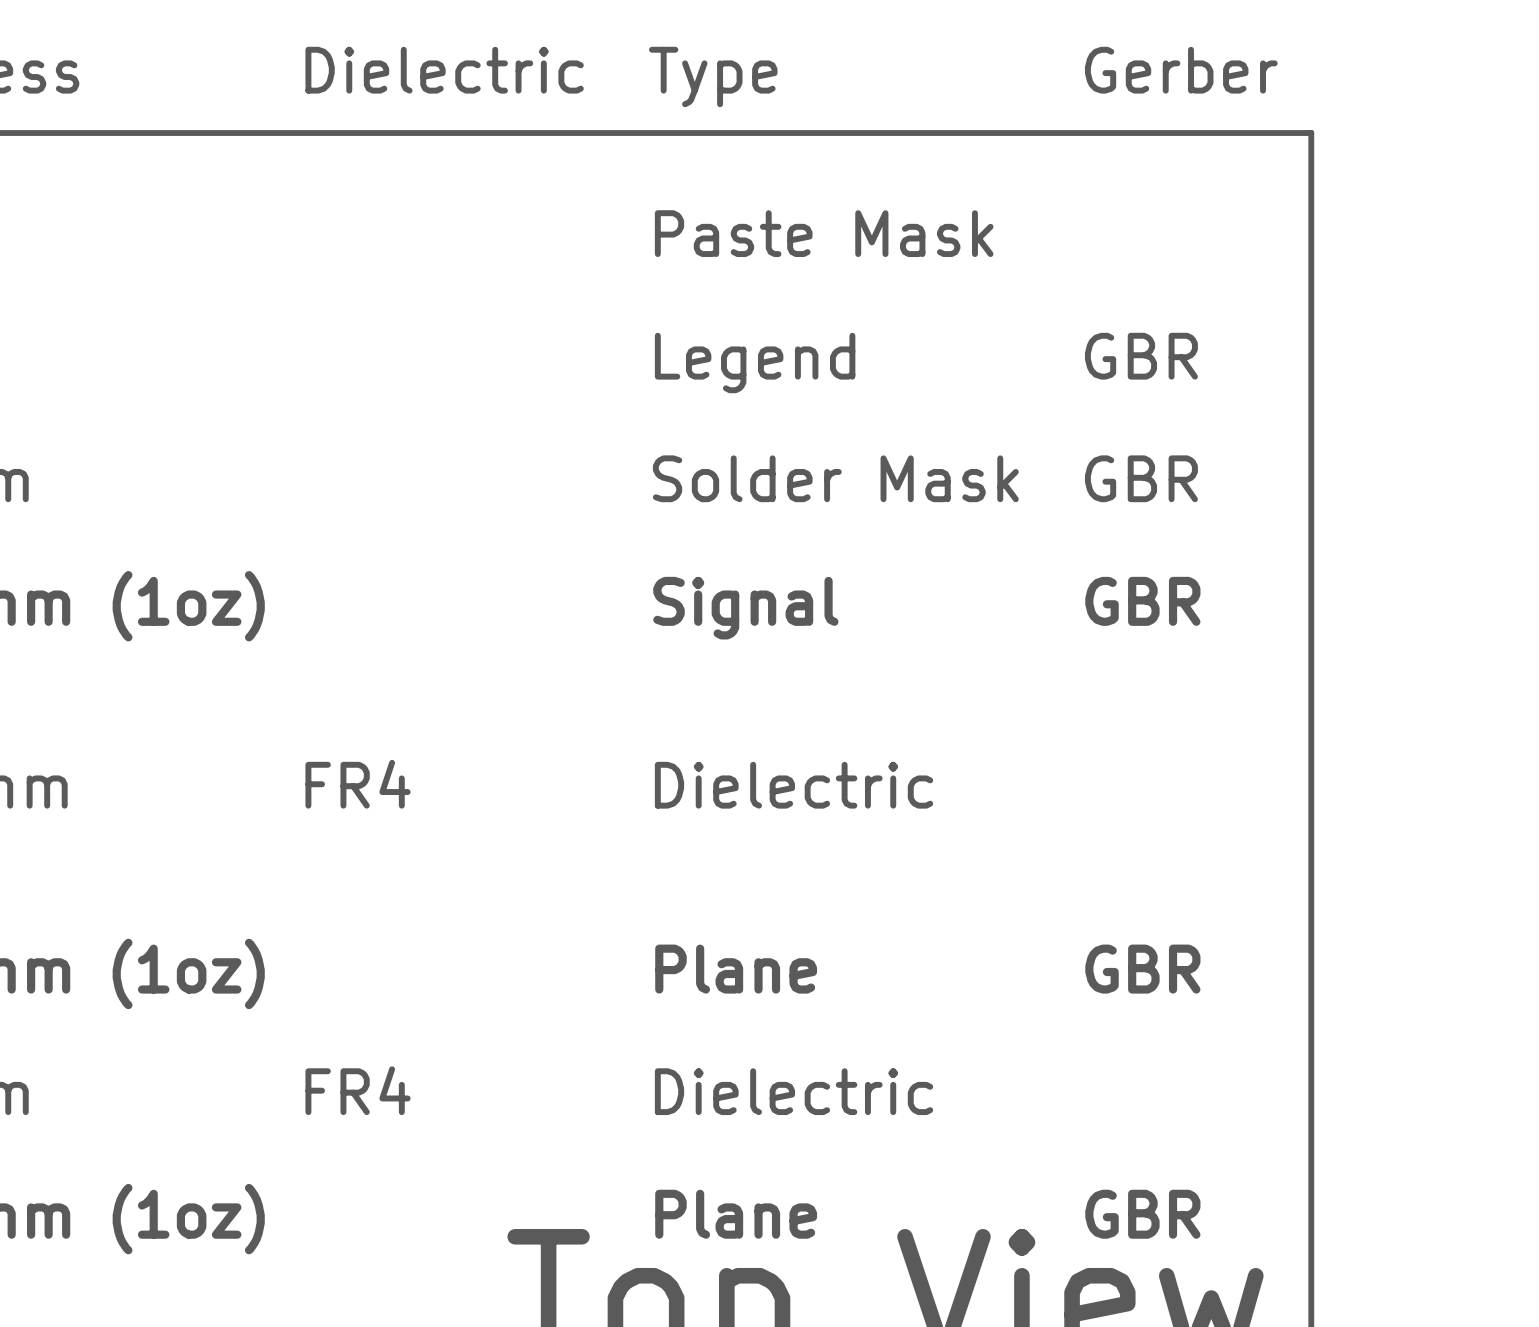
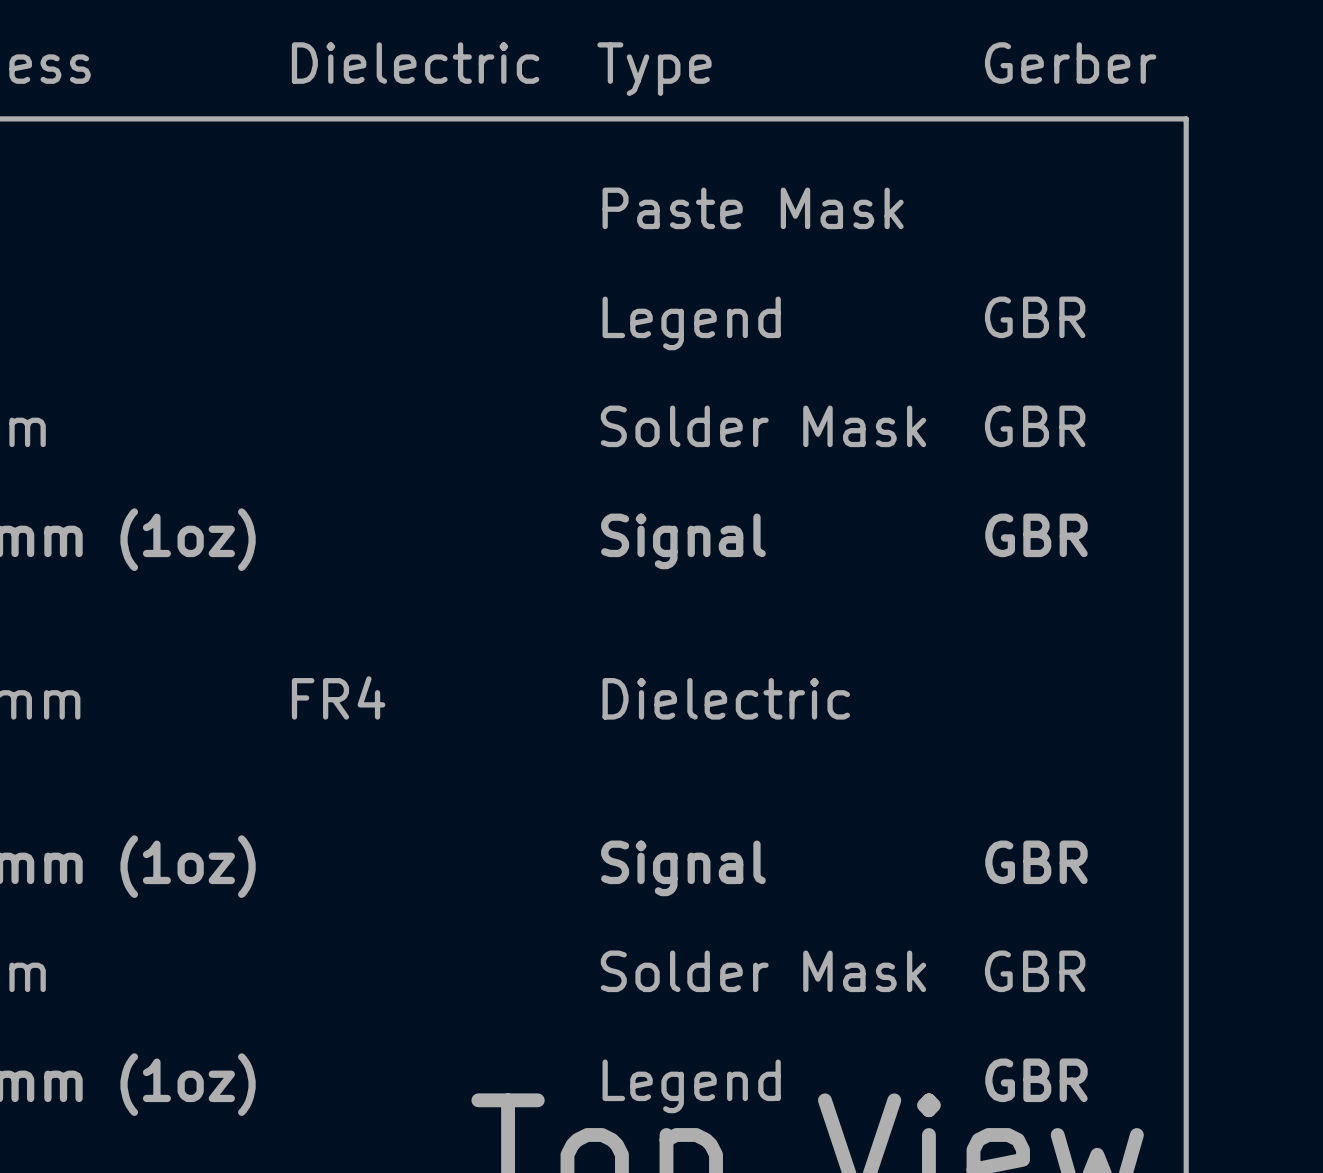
text: Plane (736, 969) -> Signal (683, 868)
text: FR4 (358, 1090) -> none
text: Dielectric (794, 1091) -> Solder Mask (763, 971)
text: none -> GBR (1035, 971)
text: Plane (736, 1214) -> Legend (691, 1086)

